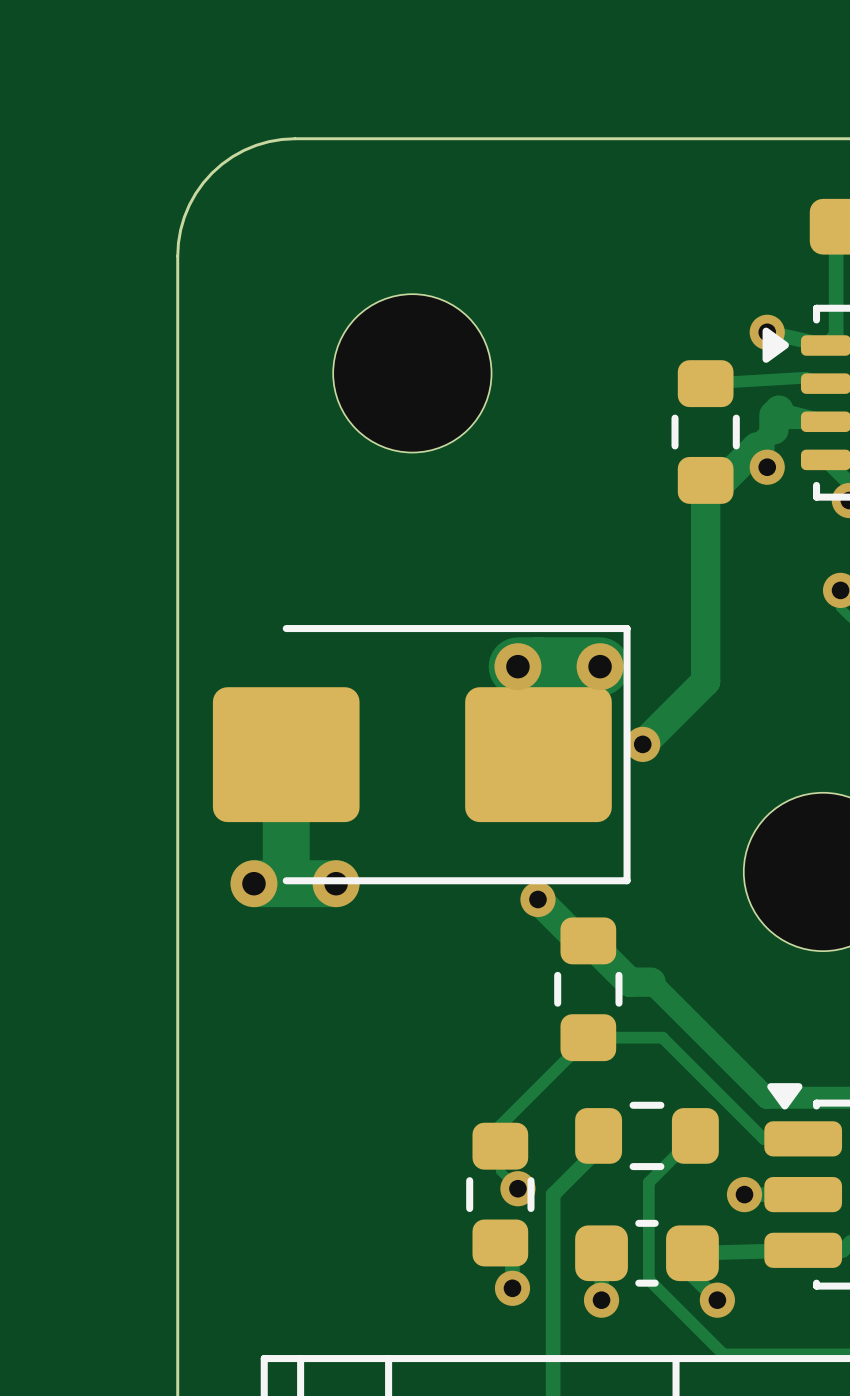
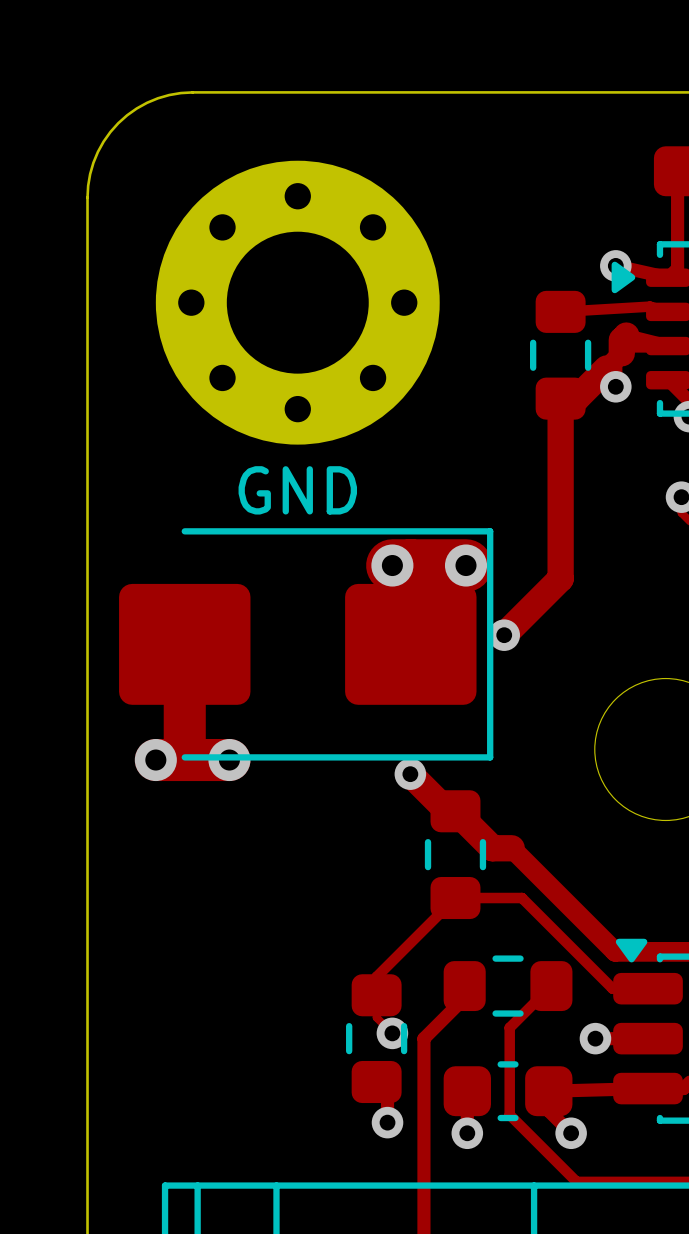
part footprint: [333, 294, 492, 453] -> [155, 160, 440, 445]
text: none -> GND (297, 490)

